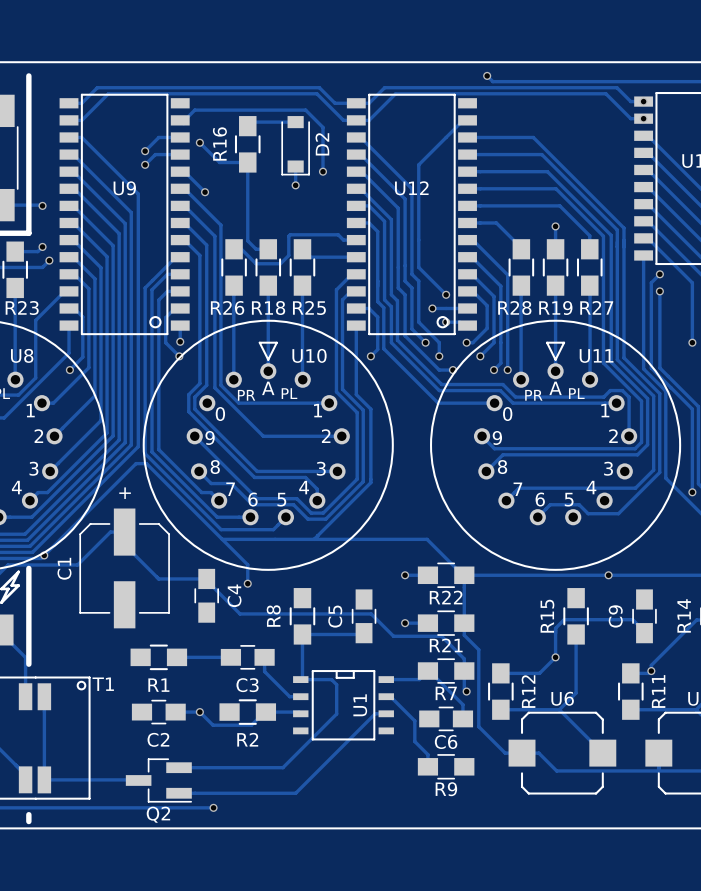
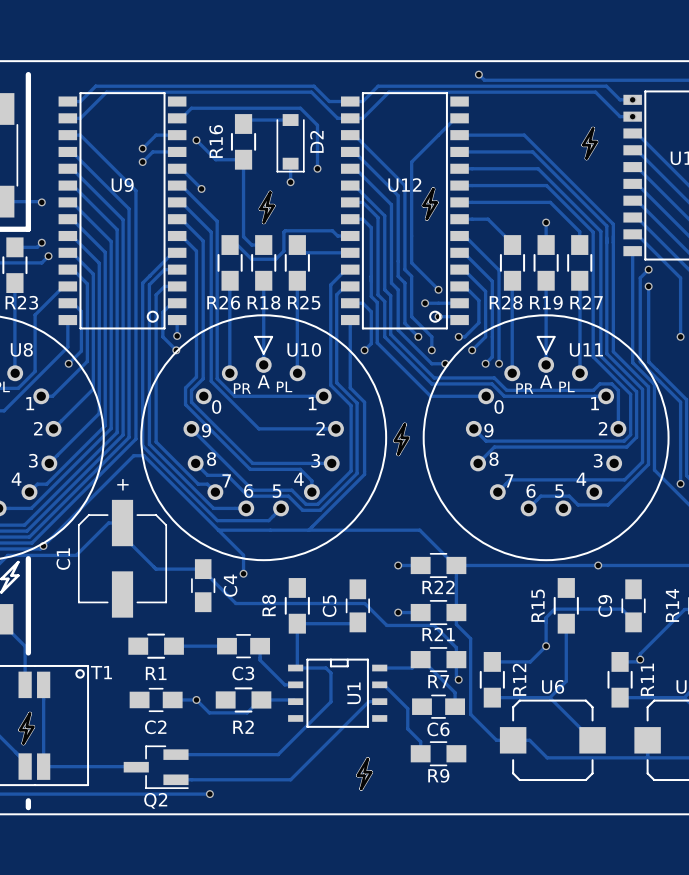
part: none -> (589, 143)
part: none -> (430, 204)
part: none -> (267, 207)
part: none -> (401, 439)
part: none -> (26, 728)
part: none -> (364, 773)

